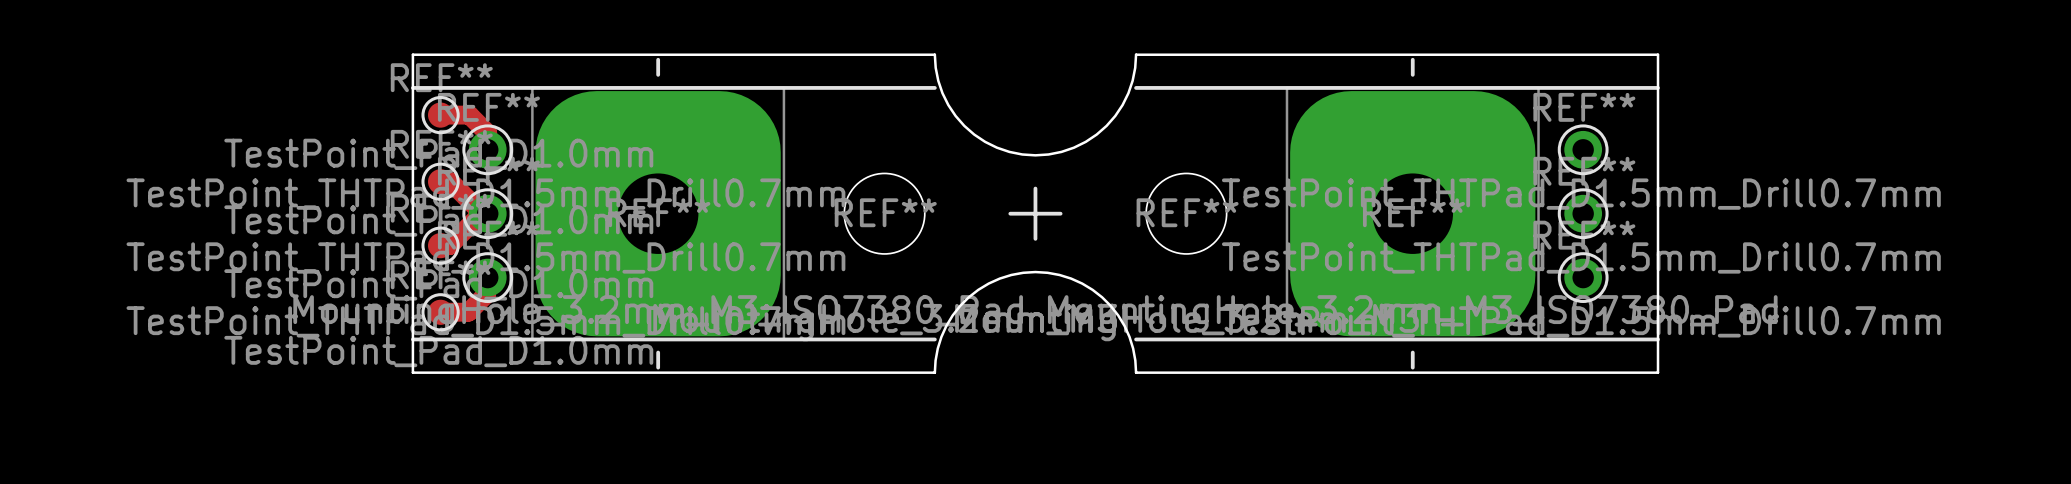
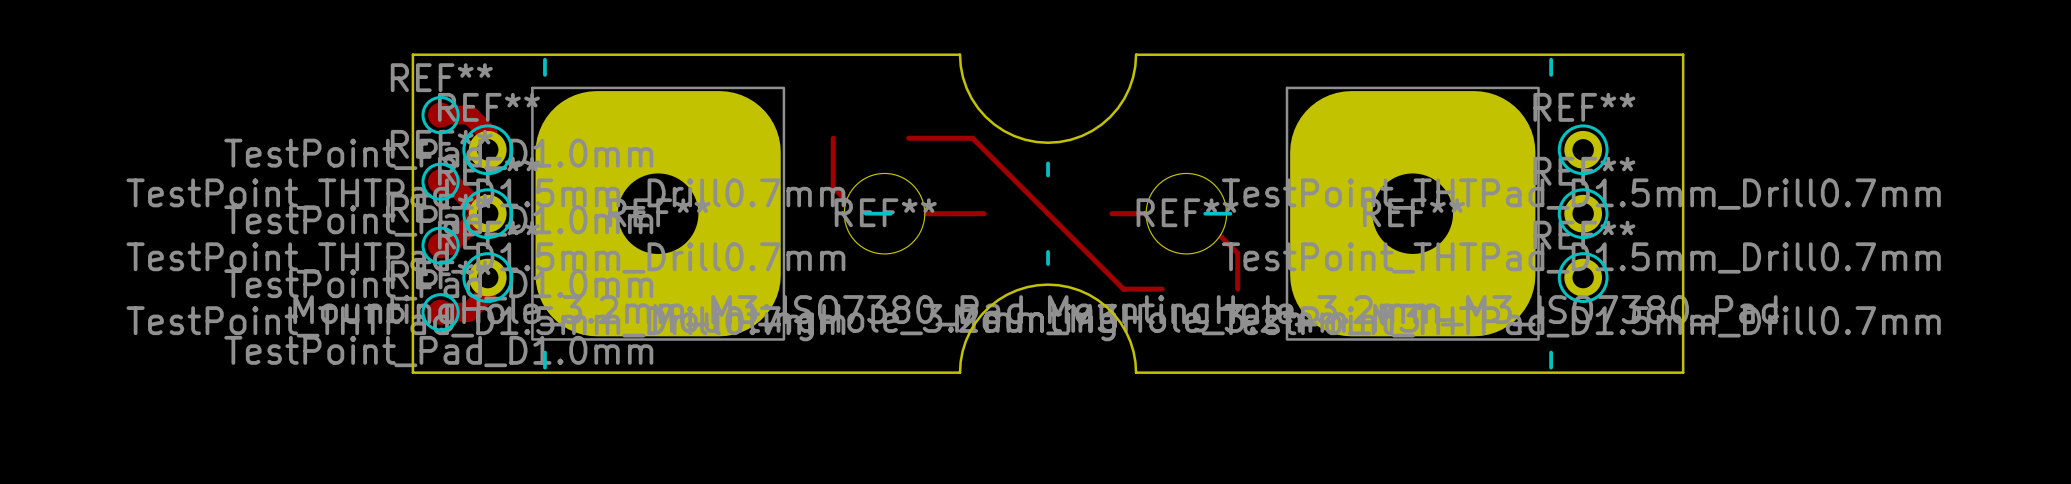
board edge: (934, 54) (938, 80) (942, 93) (955, 115) (964, 125) (974, 134) (996, 147) (1009, 151) (1035, 155) (1061, 151) (1073, 147) (1096, 134) (1106, 125) (1122, 105) (1128, 93) (1132, 80) (1136, 54) -> (934, 54) (960, 54) (962, 77) (971, 98) (985, 116) (994, 124) (1004, 130) (1025, 139) (1048, 142) (1070, 139) (1081, 136) (1092, 130) (1110, 116) (1124, 98) (1129, 88) (1133, 77) (1136, 54)
board edge: (1658, 54) (1658, 372) -> (1658, 54) (1683, 54) (1683, 372) (1658, 372)
line: (658, 59) (658, 74) -> (544, 59) (544, 74)
line: (1412, 59) (1412, 74) -> (1551, 59) (1551, 74)
line: (412, 87) (934, 87) -> none
line: (1136, 87) (1658, 87) -> none
top track: none -> (833, 138) (833, 187) (859, 213) (984, 213)
top track: none -> (908, 138) (972, 138) (1123, 289) (1162, 289)
line: none -> (1048, 163) (1048, 175)
line: (1035, 188) (1035, 238) -> none
line: none -> (865, 213) (890, 213)
line: (1010, 213) (1060, 213) -> none
top track: none -> (1111, 213) (1198, 213) (1237, 253) (1237, 289)
line: none -> (1205, 213) (1230, 213)
line: none -> (1048, 251) (1048, 264)
line: (412, 339) (934, 339) -> none
line: (1136, 339) (1658, 339) -> none
line: (658, 352) (658, 367) -> (544, 352) (544, 367)
line: (1412, 352) (1412, 367) -> (1551, 352) (1551, 367)
board edge: (934, 372) (941, 336) (952, 315) (968, 297) (999, 278) (1035, 272) (1071, 278) (1092, 289) (1110, 305) (1129, 336) (1136, 372) -> (934, 372) (960, 372) (962, 351) (970, 331) (982, 314) (998, 300) (1016, 290) (1048, 284) (1079, 290) (1106, 306) (1120, 322) (1130, 341) (1136, 372)

